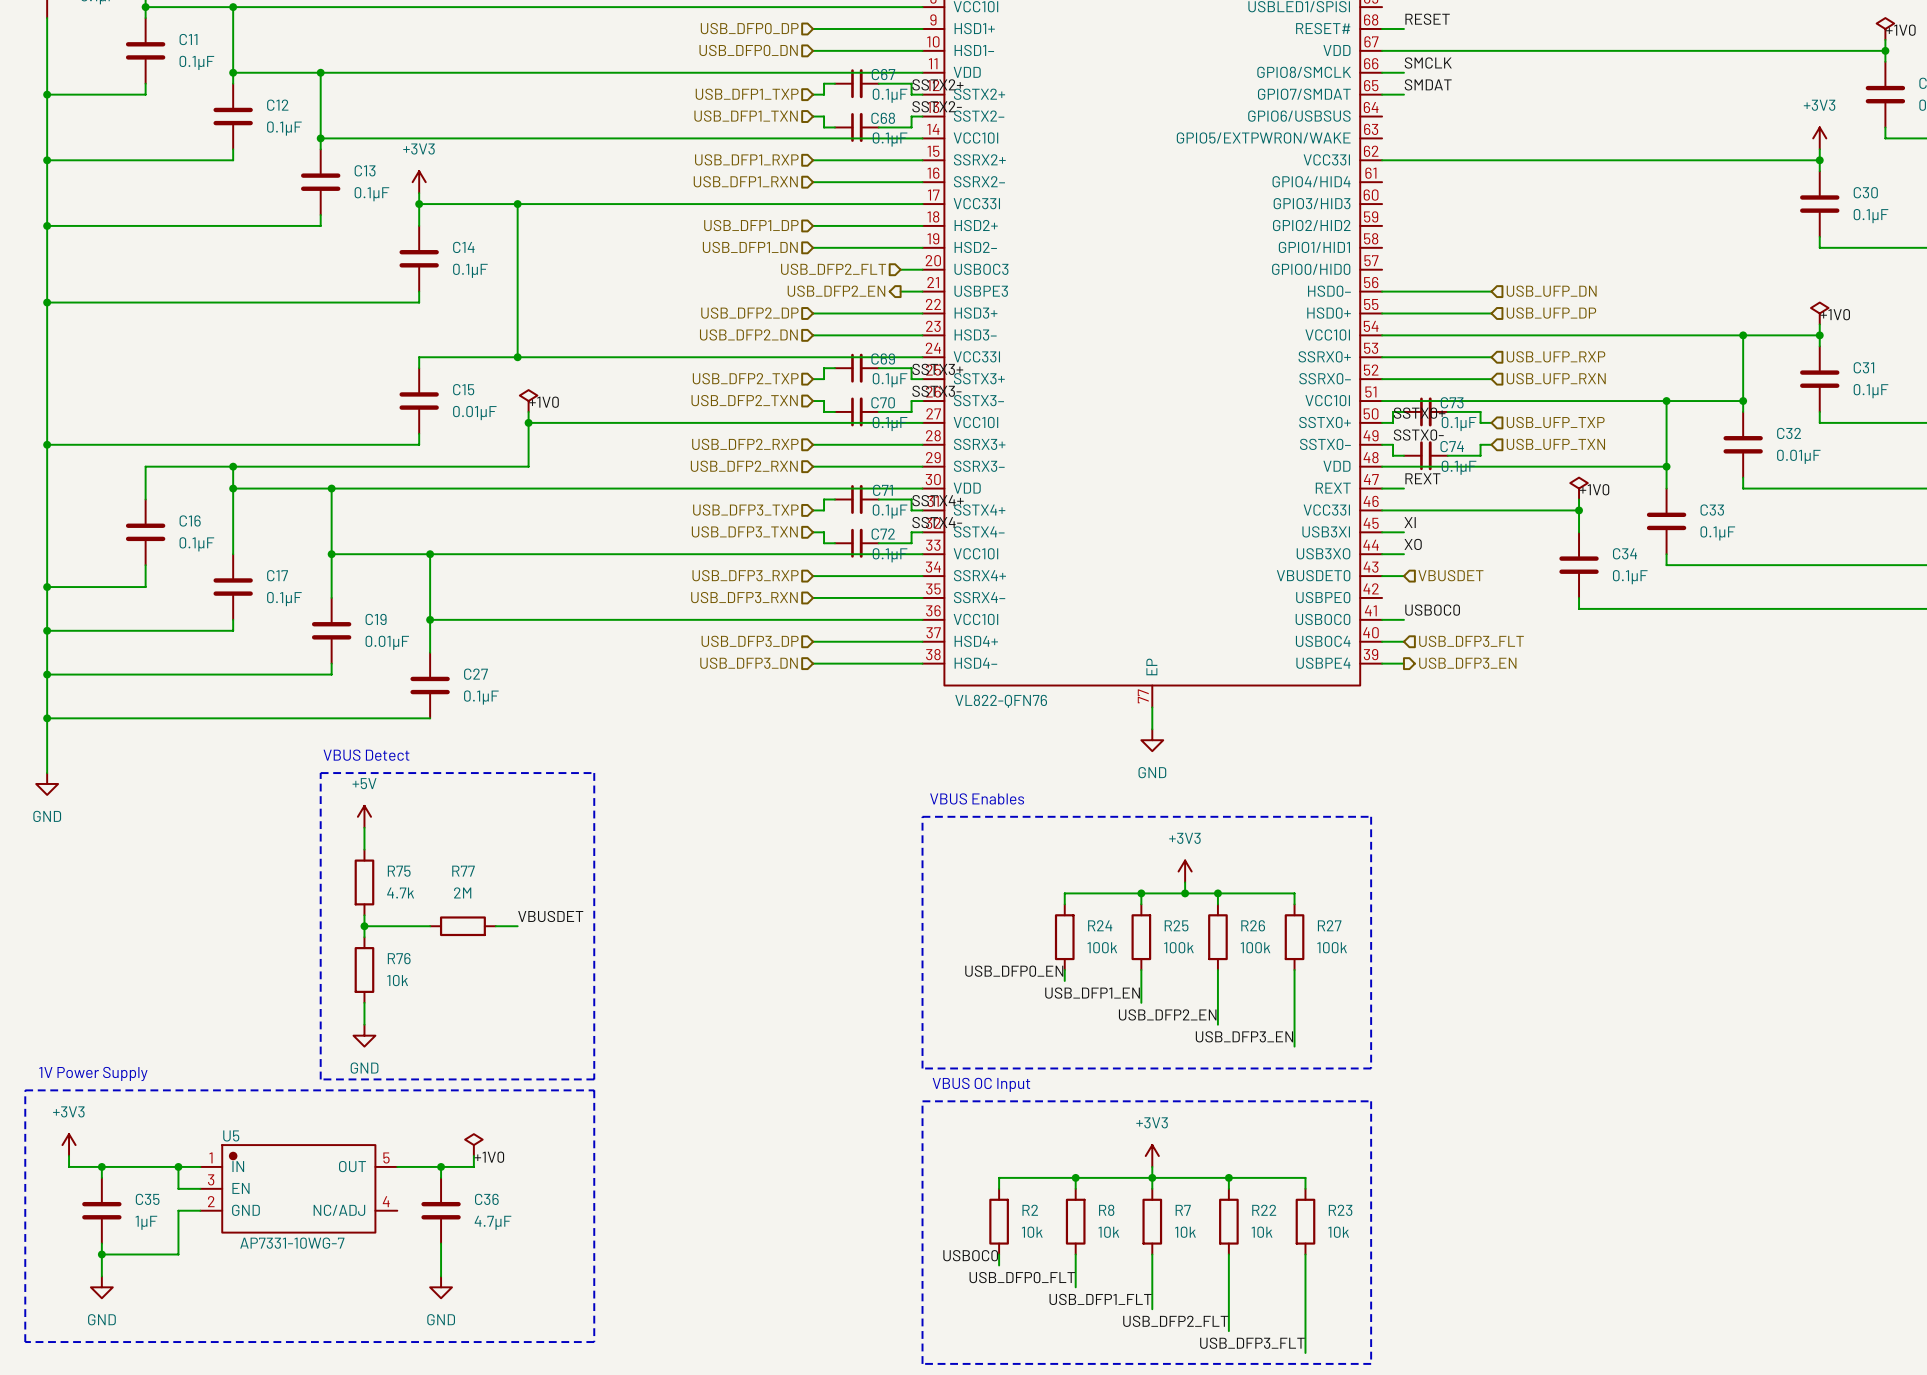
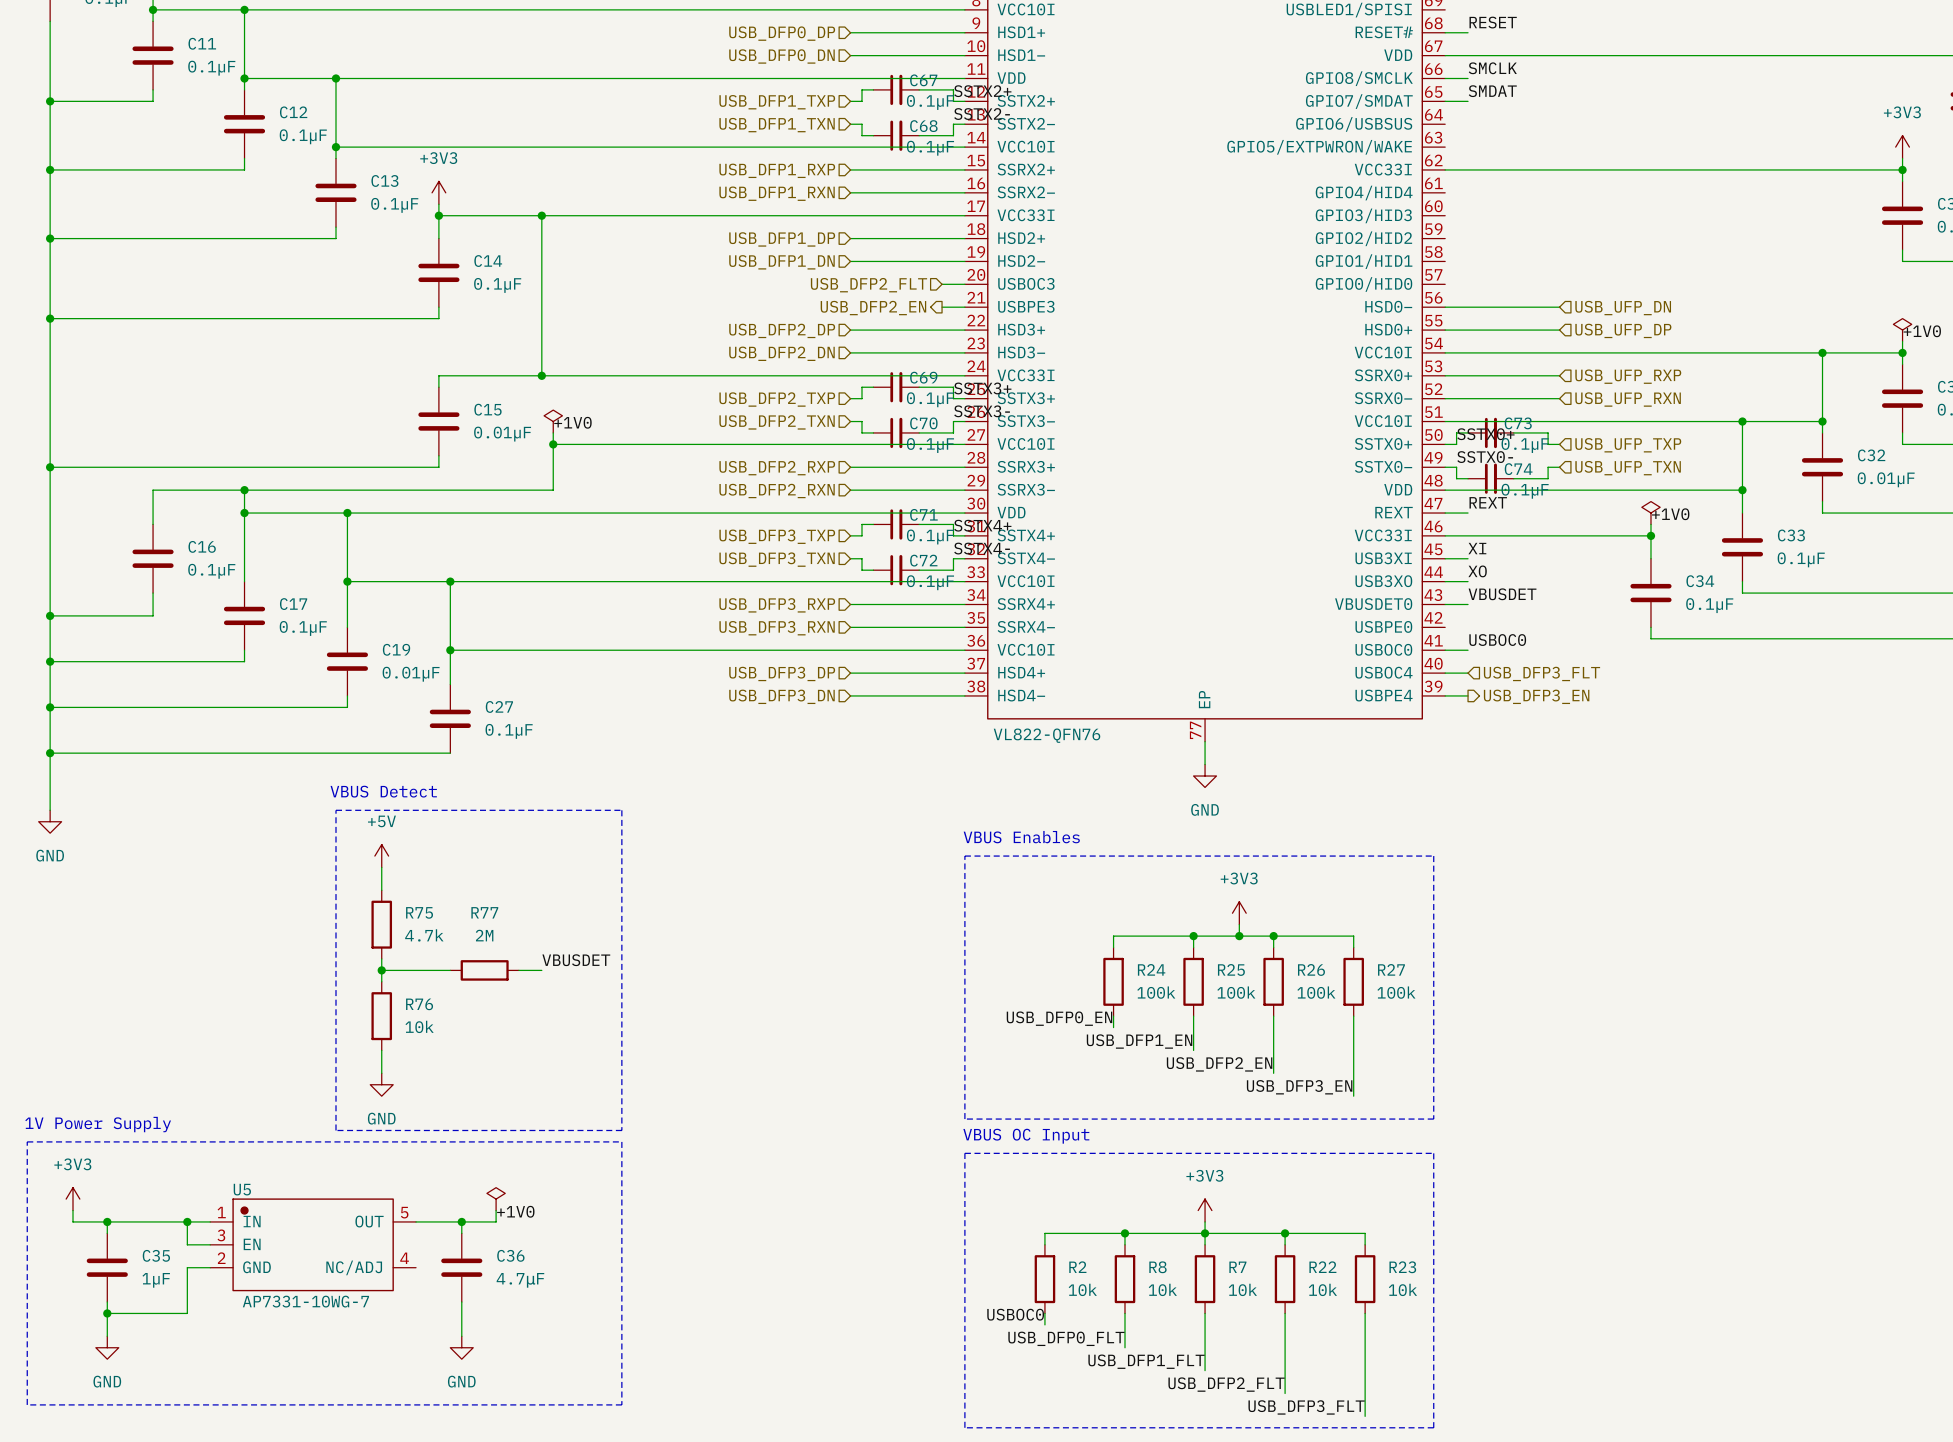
label: none -> VBUSDET (1502, 594)
hierarchical label: VBUSDET (1450, 575) -> none

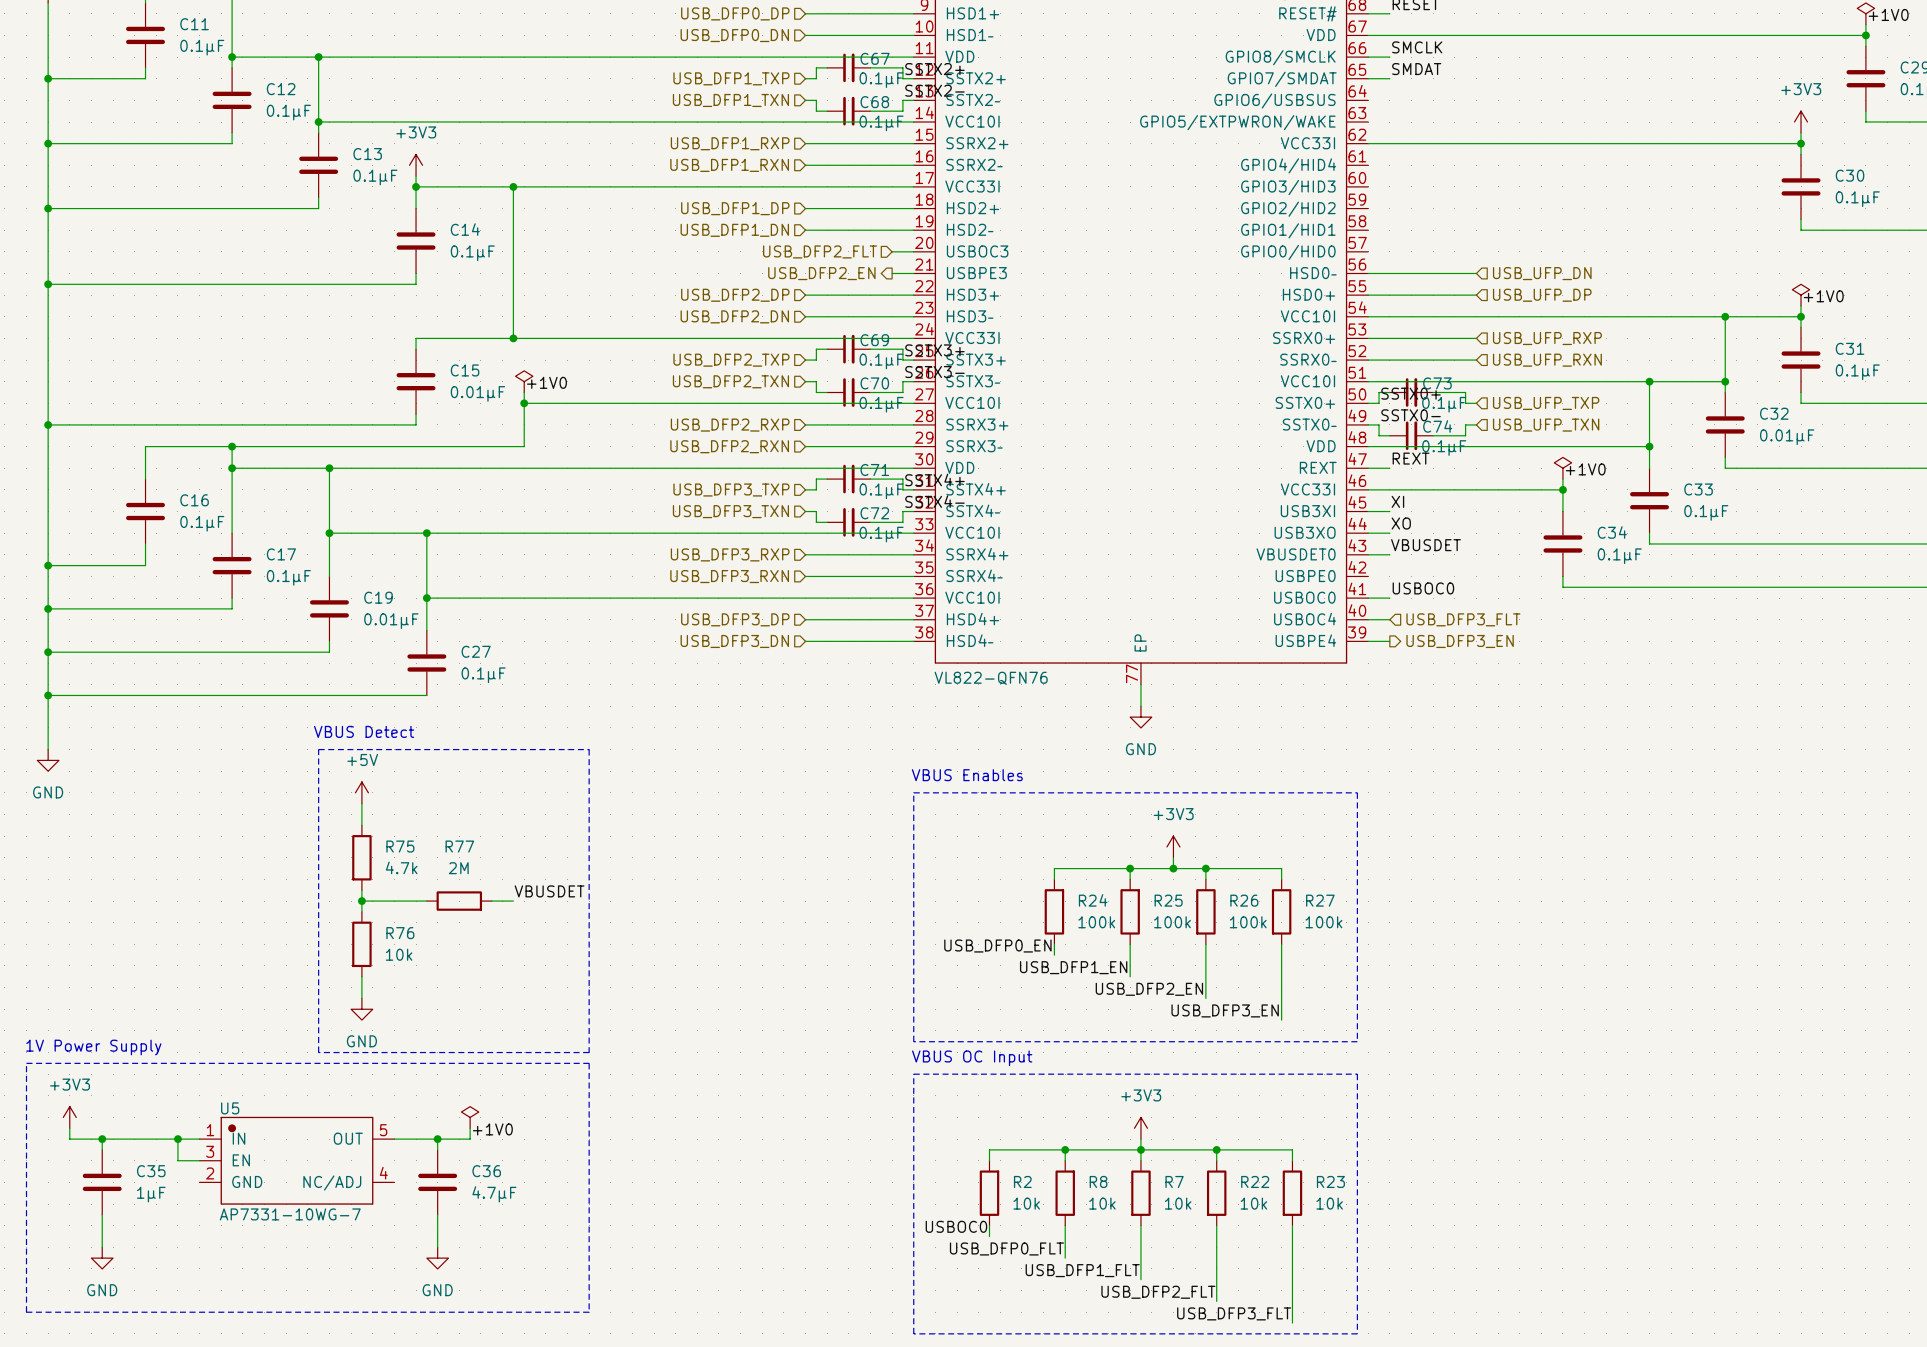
wire: (210, 1267) (187, 1267) (187, 1313) (107, 1313) -> none
junction: (107, 1313) -> none

